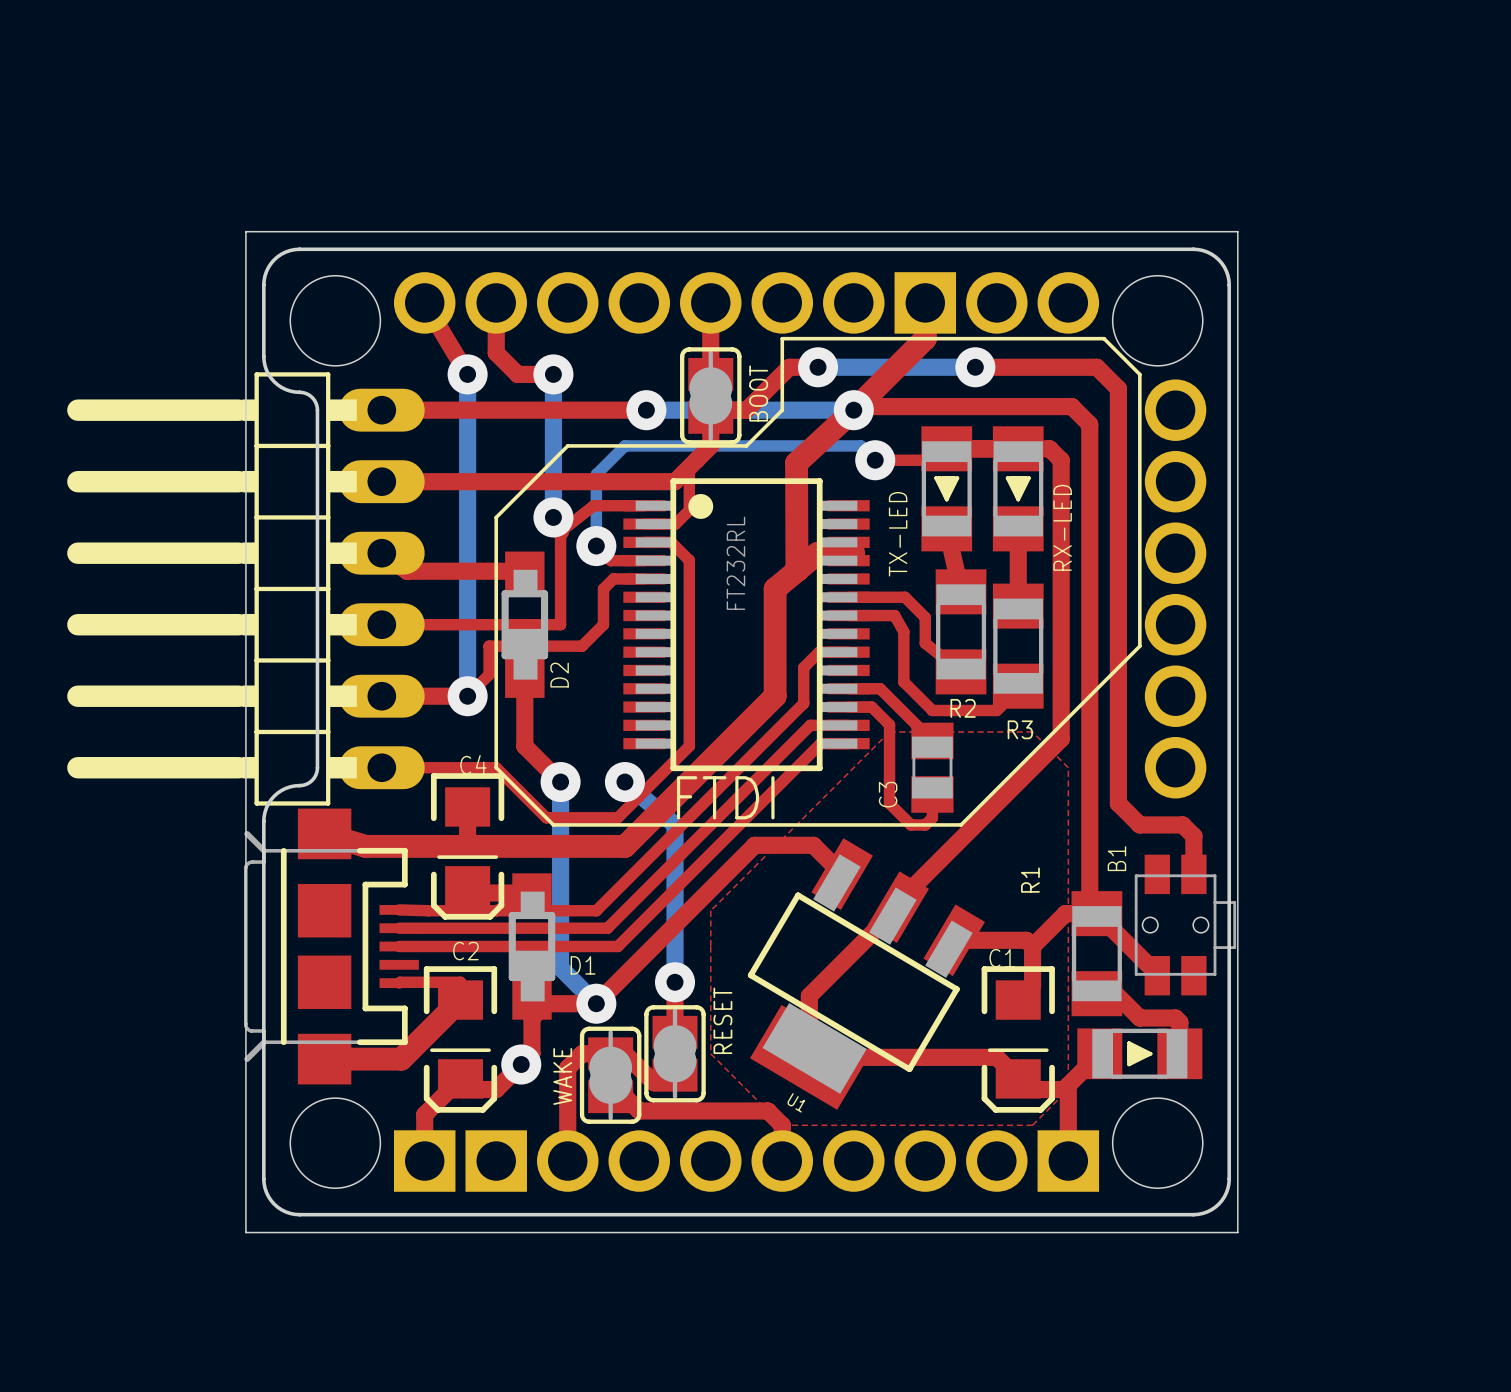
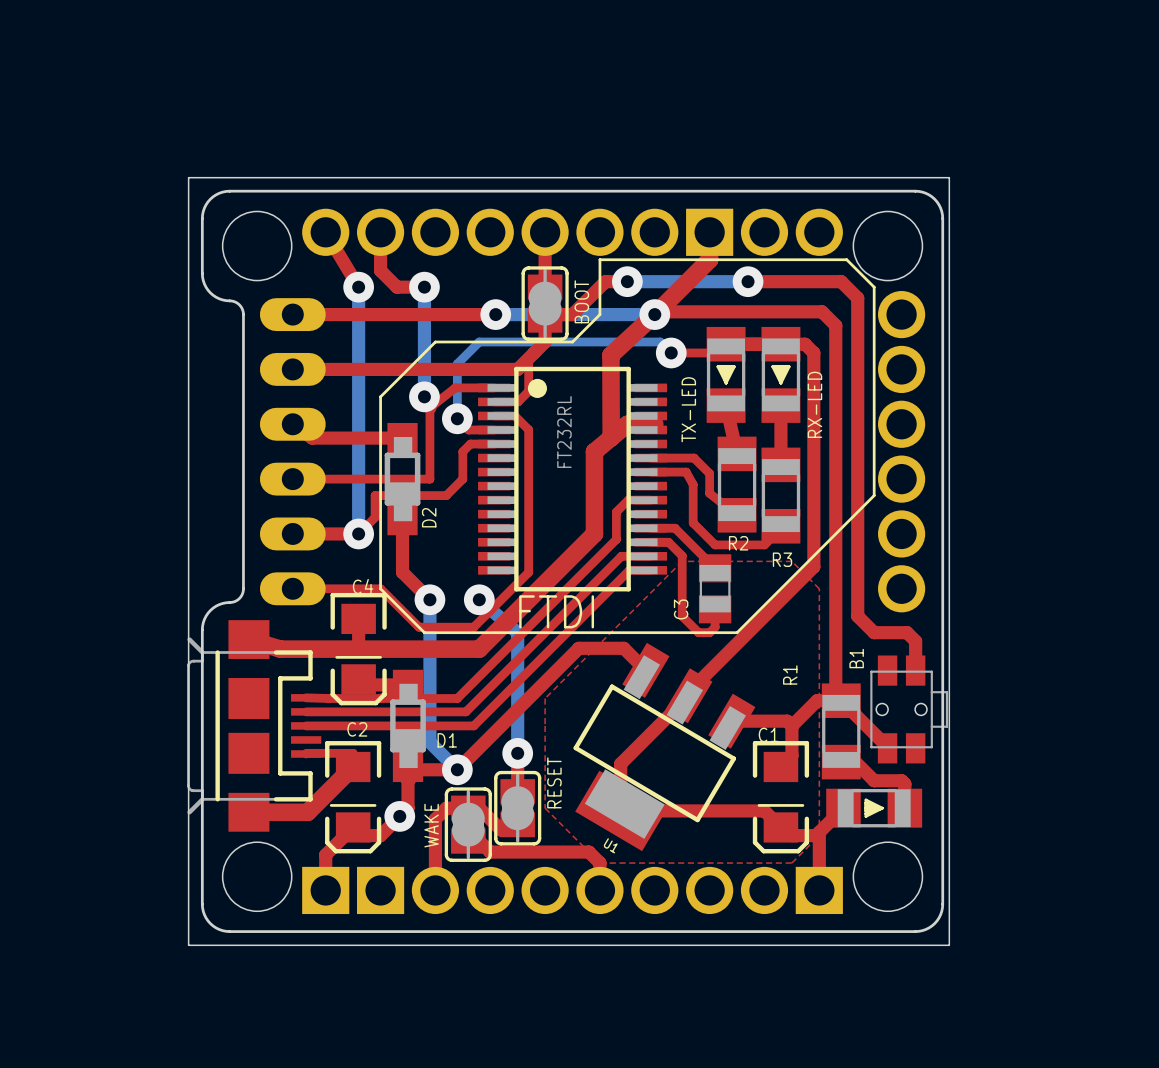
part: (245, 588) -> none
part: none -> (292, 451)

